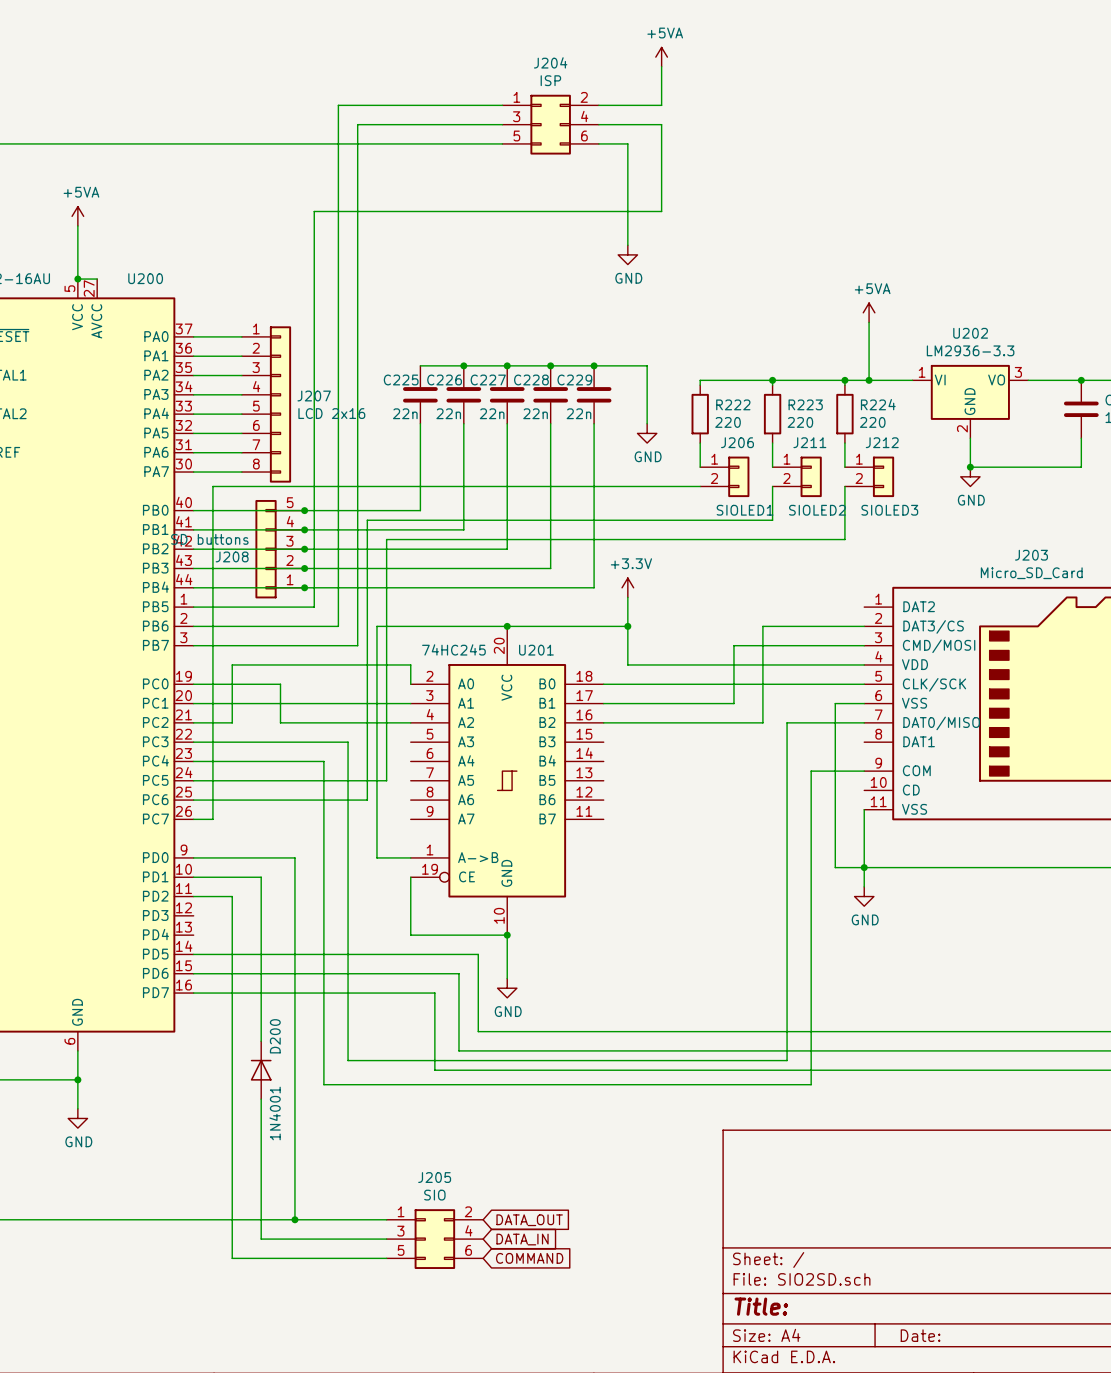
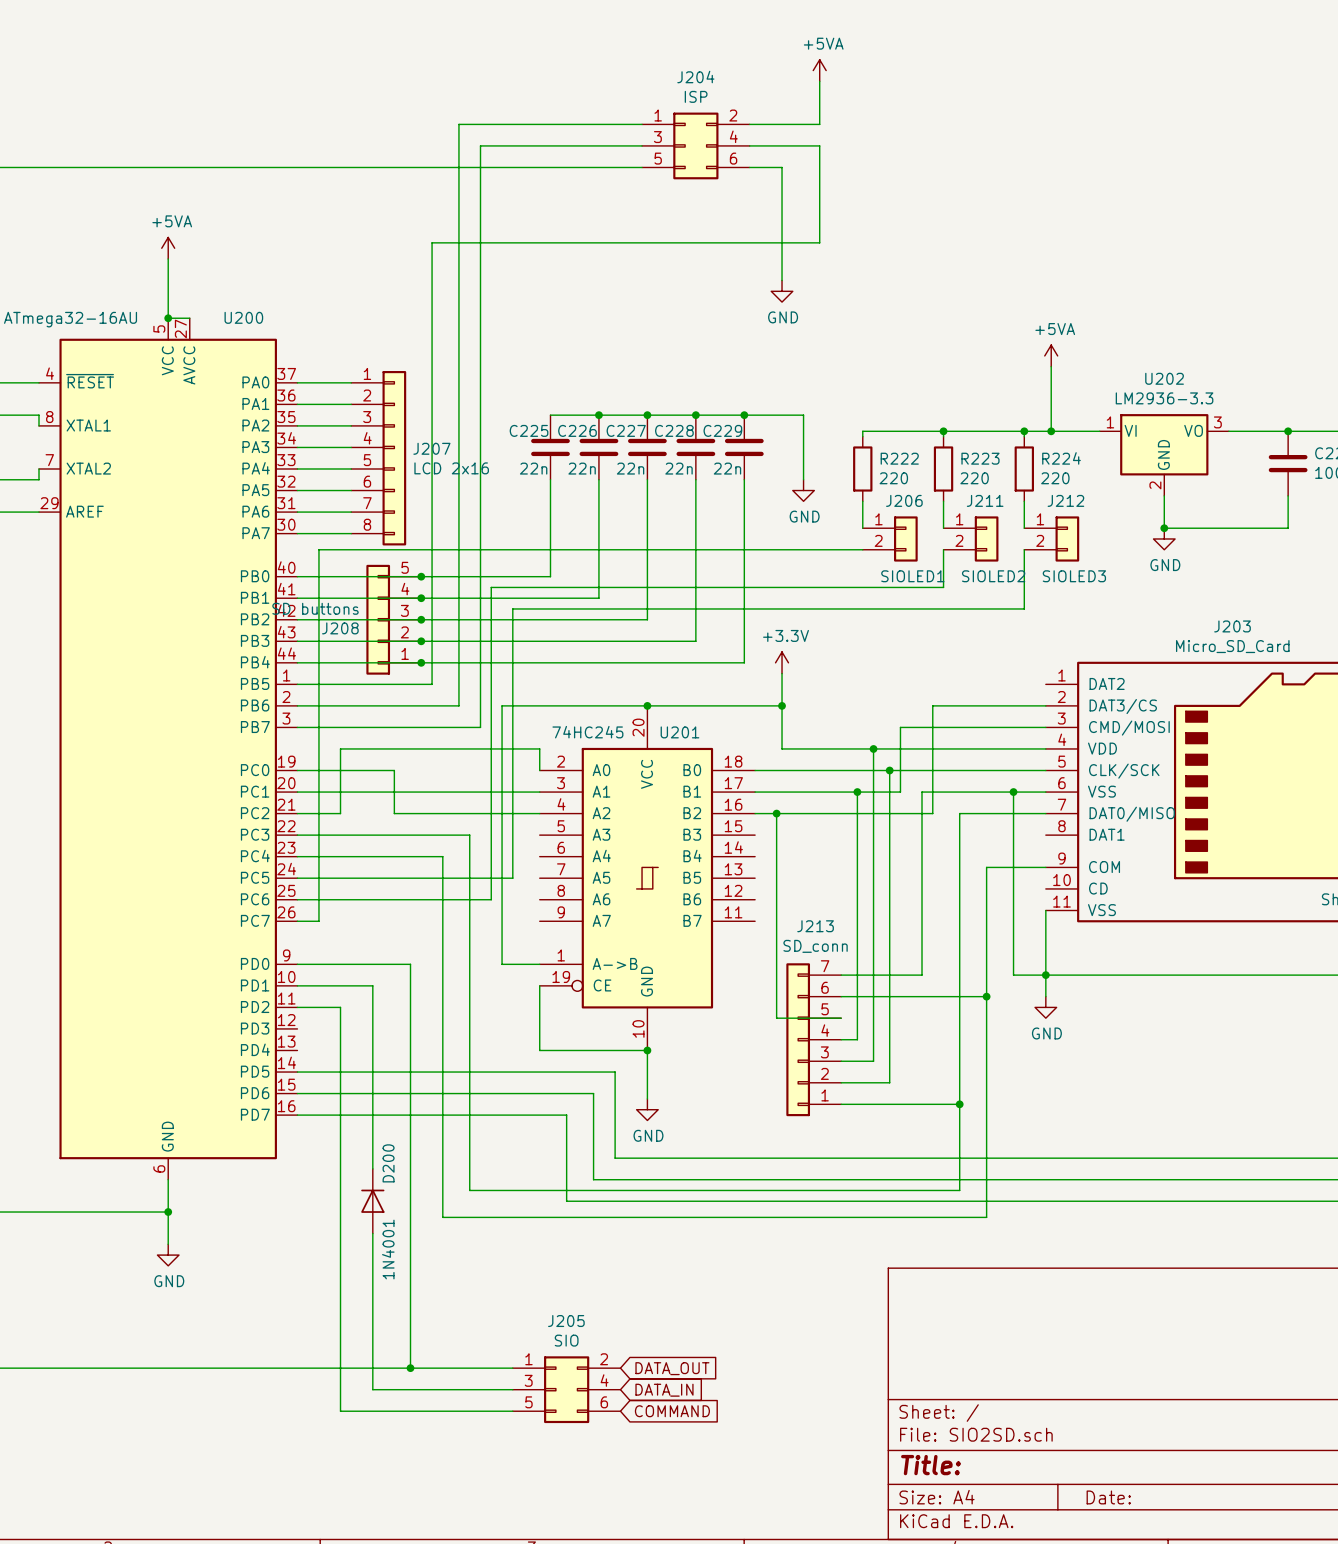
wire: none -> (873, 748) (873, 1061) (841, 1061)
junction: none -> (873, 748)
wire: none -> (889, 770) (889, 1082) (841, 1082)
junction: none -> (889, 770)
wire: none -> (857, 792) (857, 1039) (841, 1039)
junction: none -> (857, 792)
wire: none -> (1013, 792) (922, 792) (922, 975) (841, 975)
junction: none -> (1013, 792)
wire: none -> (776, 813) (776, 1018) (841, 1018)
junction: none -> (776, 813)
wire: none -> (841, 996) (986, 996)
junction: none -> (986, 996)
J213: none -> SD_conn (813, 1039)
wire: none -> (841, 1104) (959, 1104)
junction: none -> (959, 1104)

